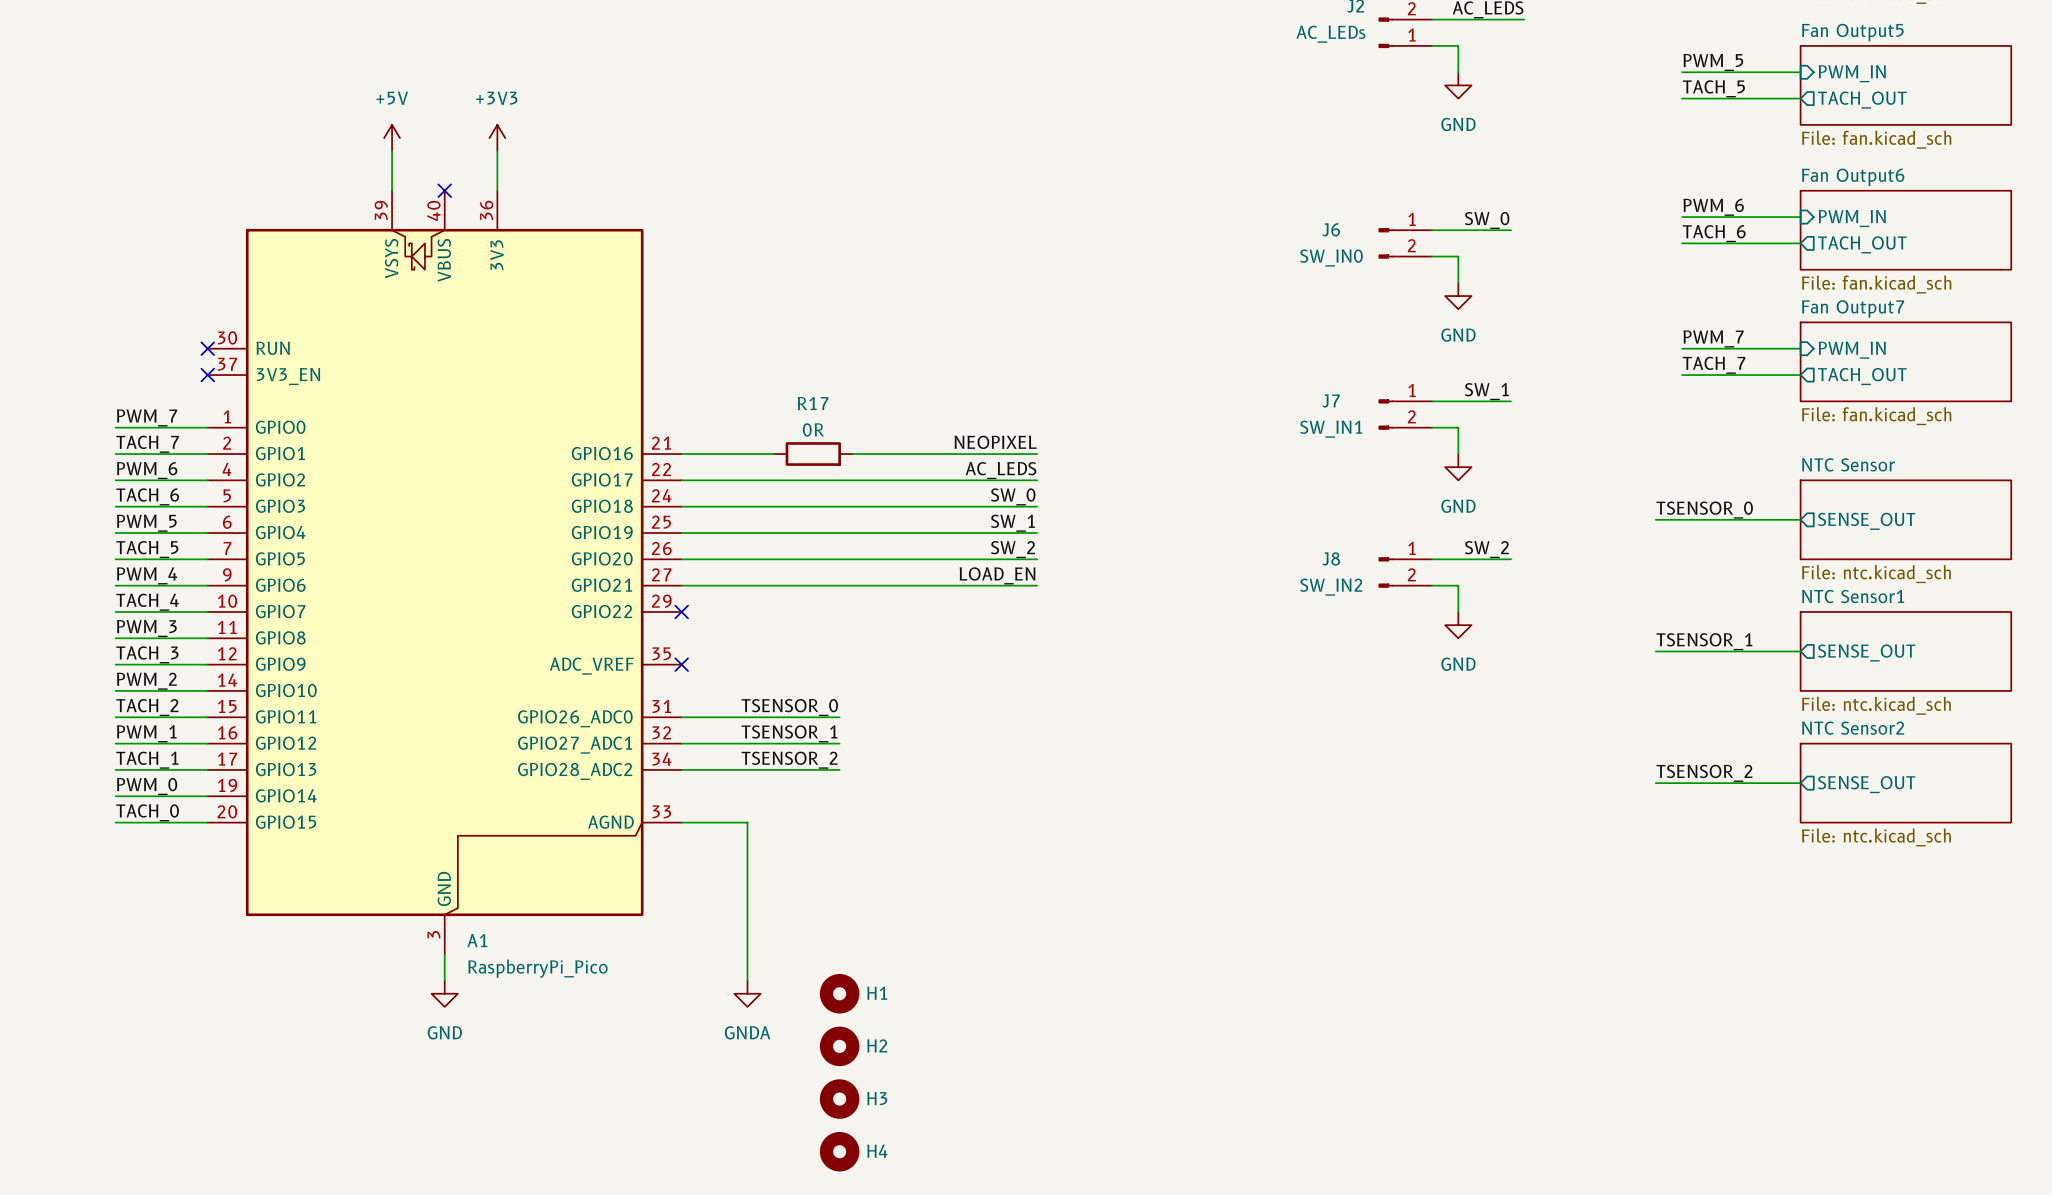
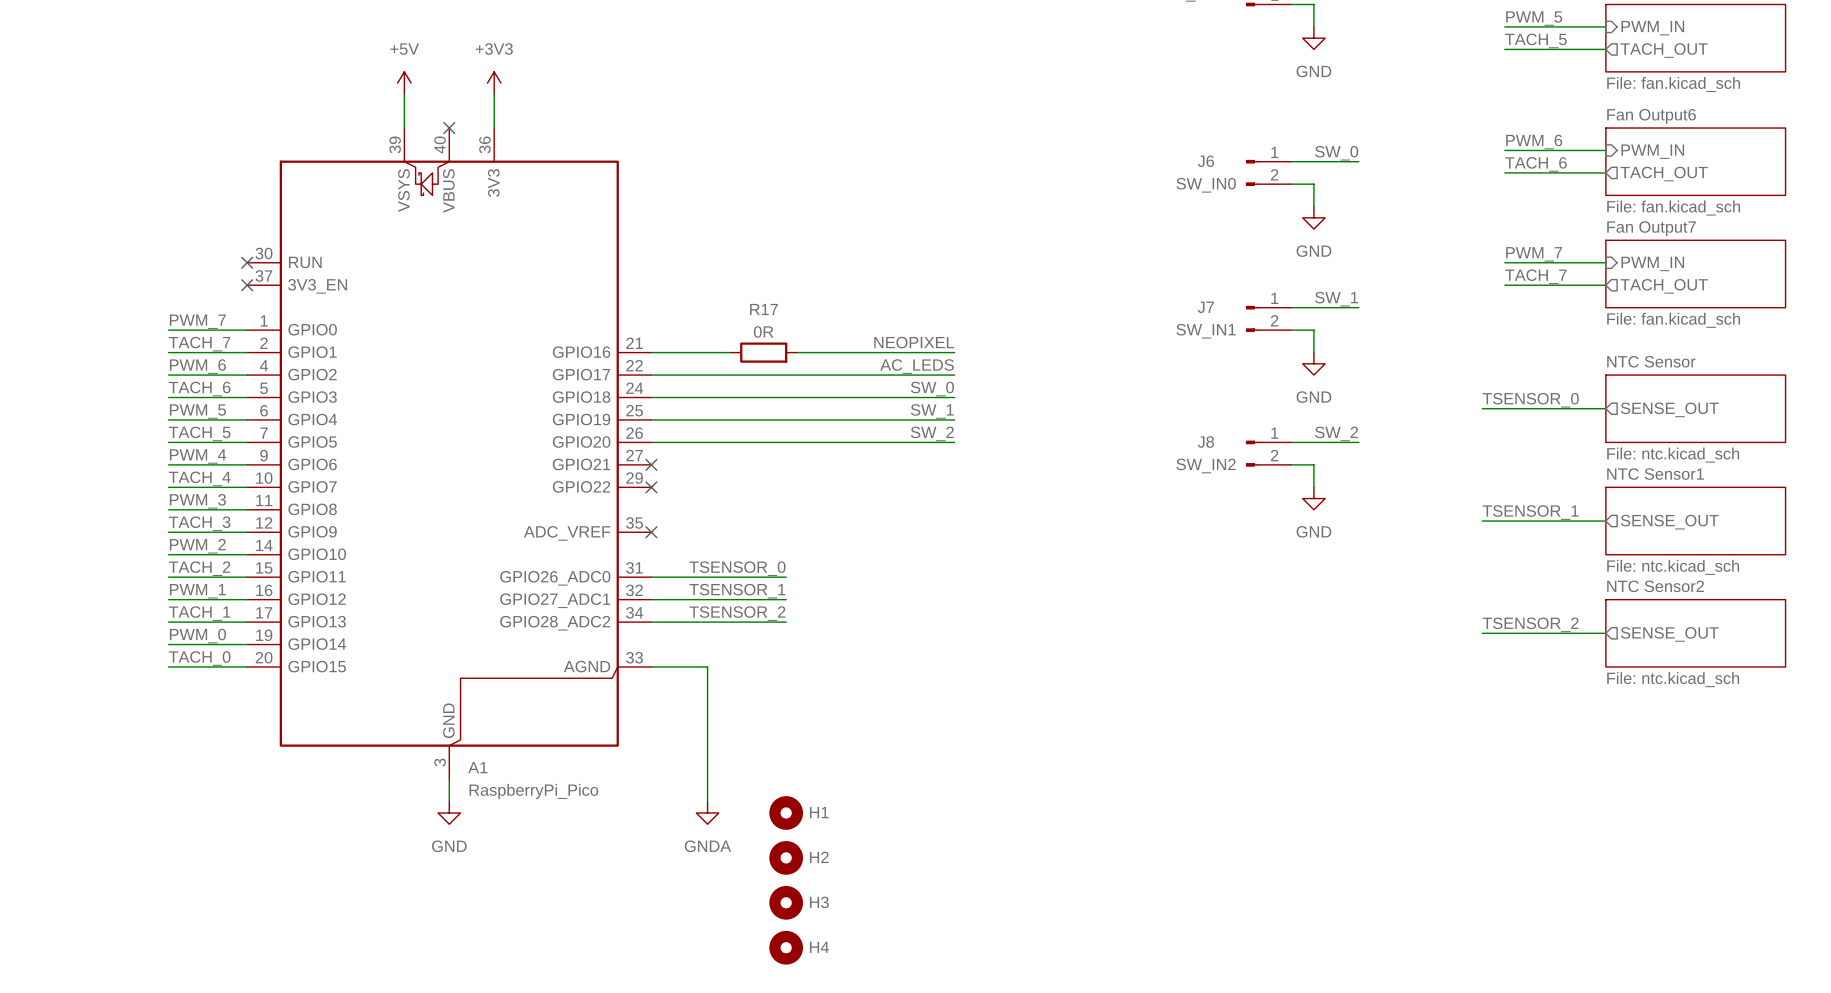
label: LOAD_EN (997, 575) -> none
wire: (681, 585) (1037, 585) -> none
no-connect mark: none -> (651, 464)

